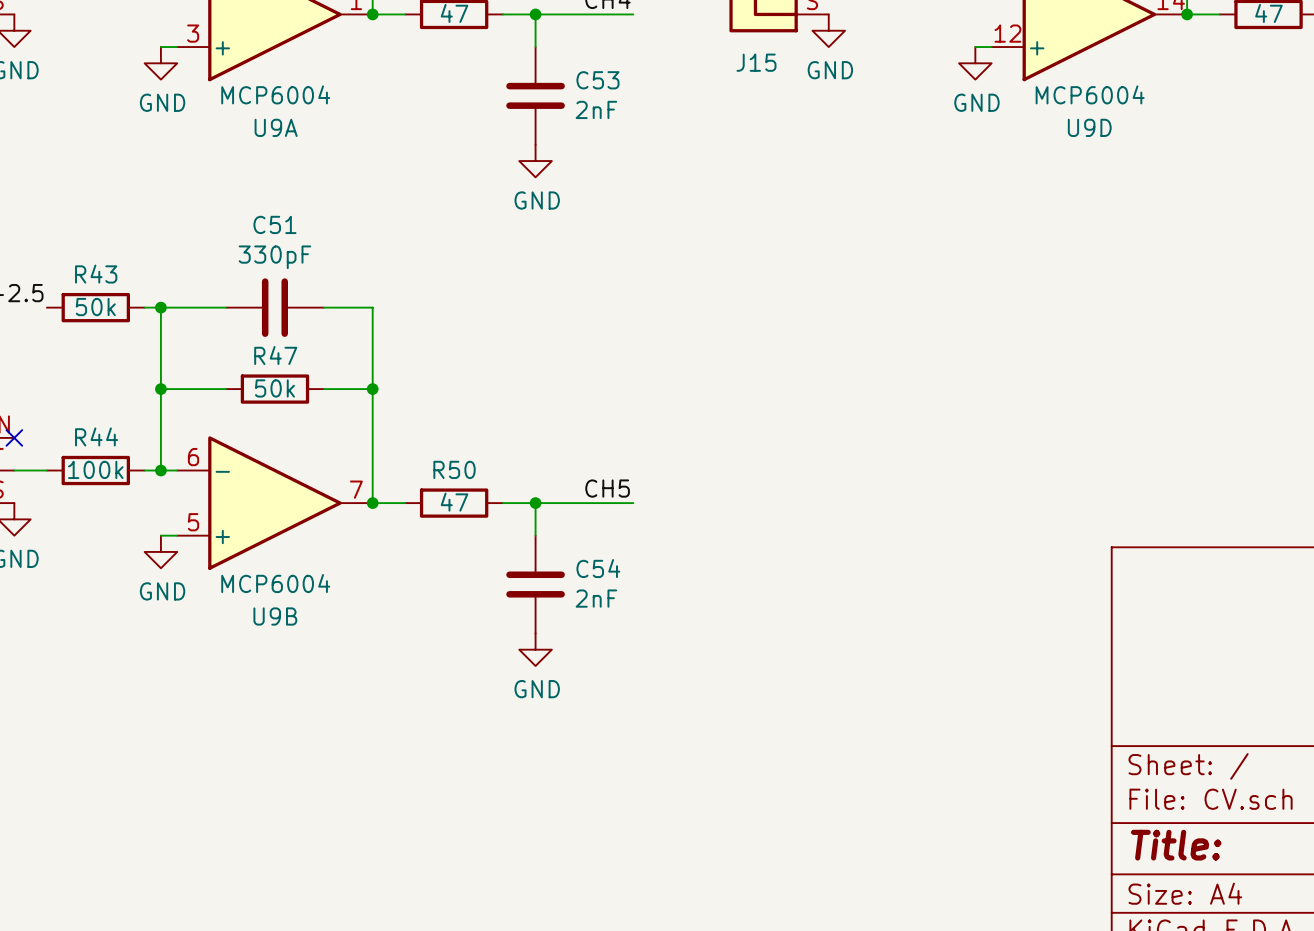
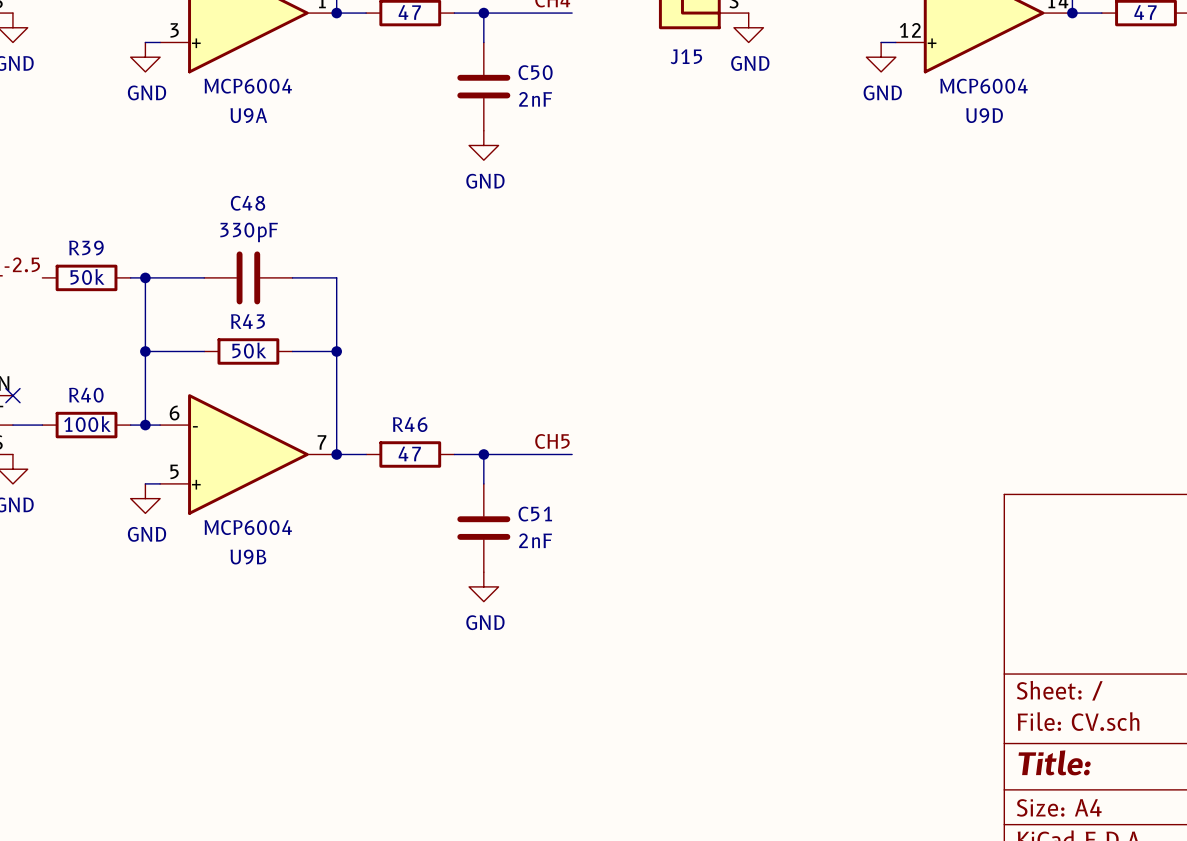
C53 name: C53 (597, 80) -> C50 (535, 72)
C51 name: C51 (274, 224) -> C48 (248, 203)
R43 name: R43 (96, 274) -> R39 (86, 248)
R47 name: R47 (275, 355) -> R43 (247, 321)
R44 name: R44 (96, 436) -> R40 (86, 395)
R50 name: R50 (454, 469) -> R46 (410, 424)
C54 name: C54 (598, 568) -> C51 (535, 514)

